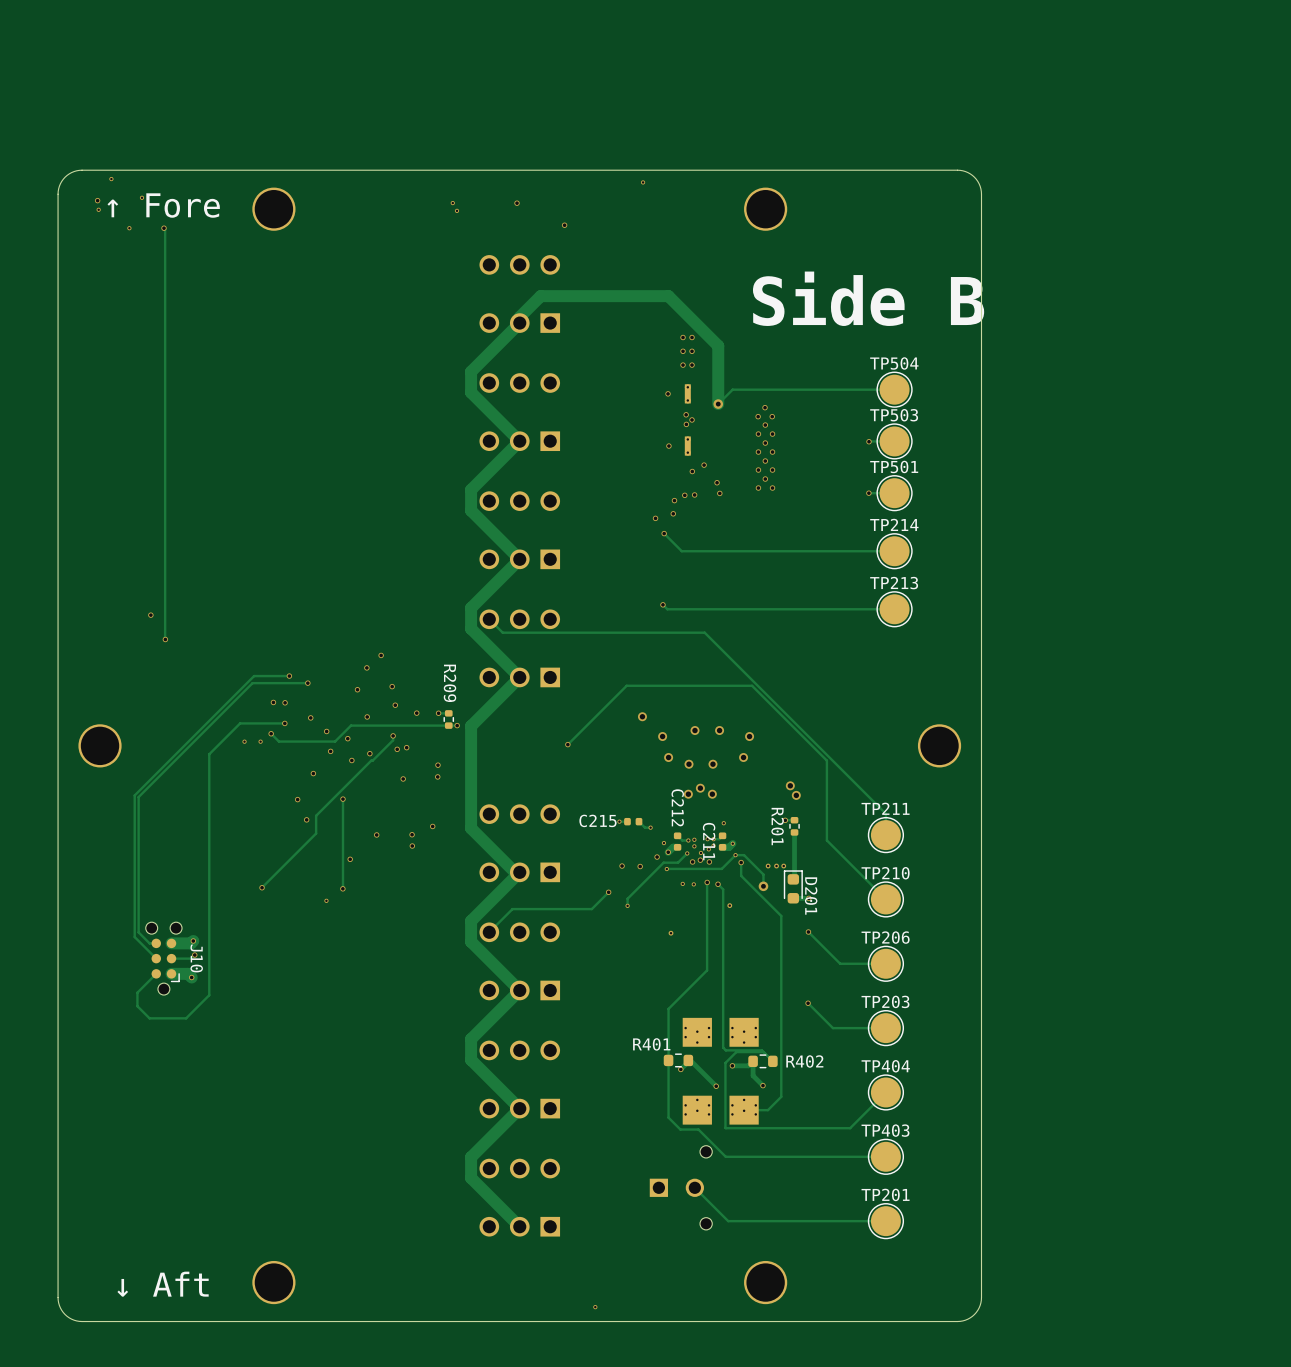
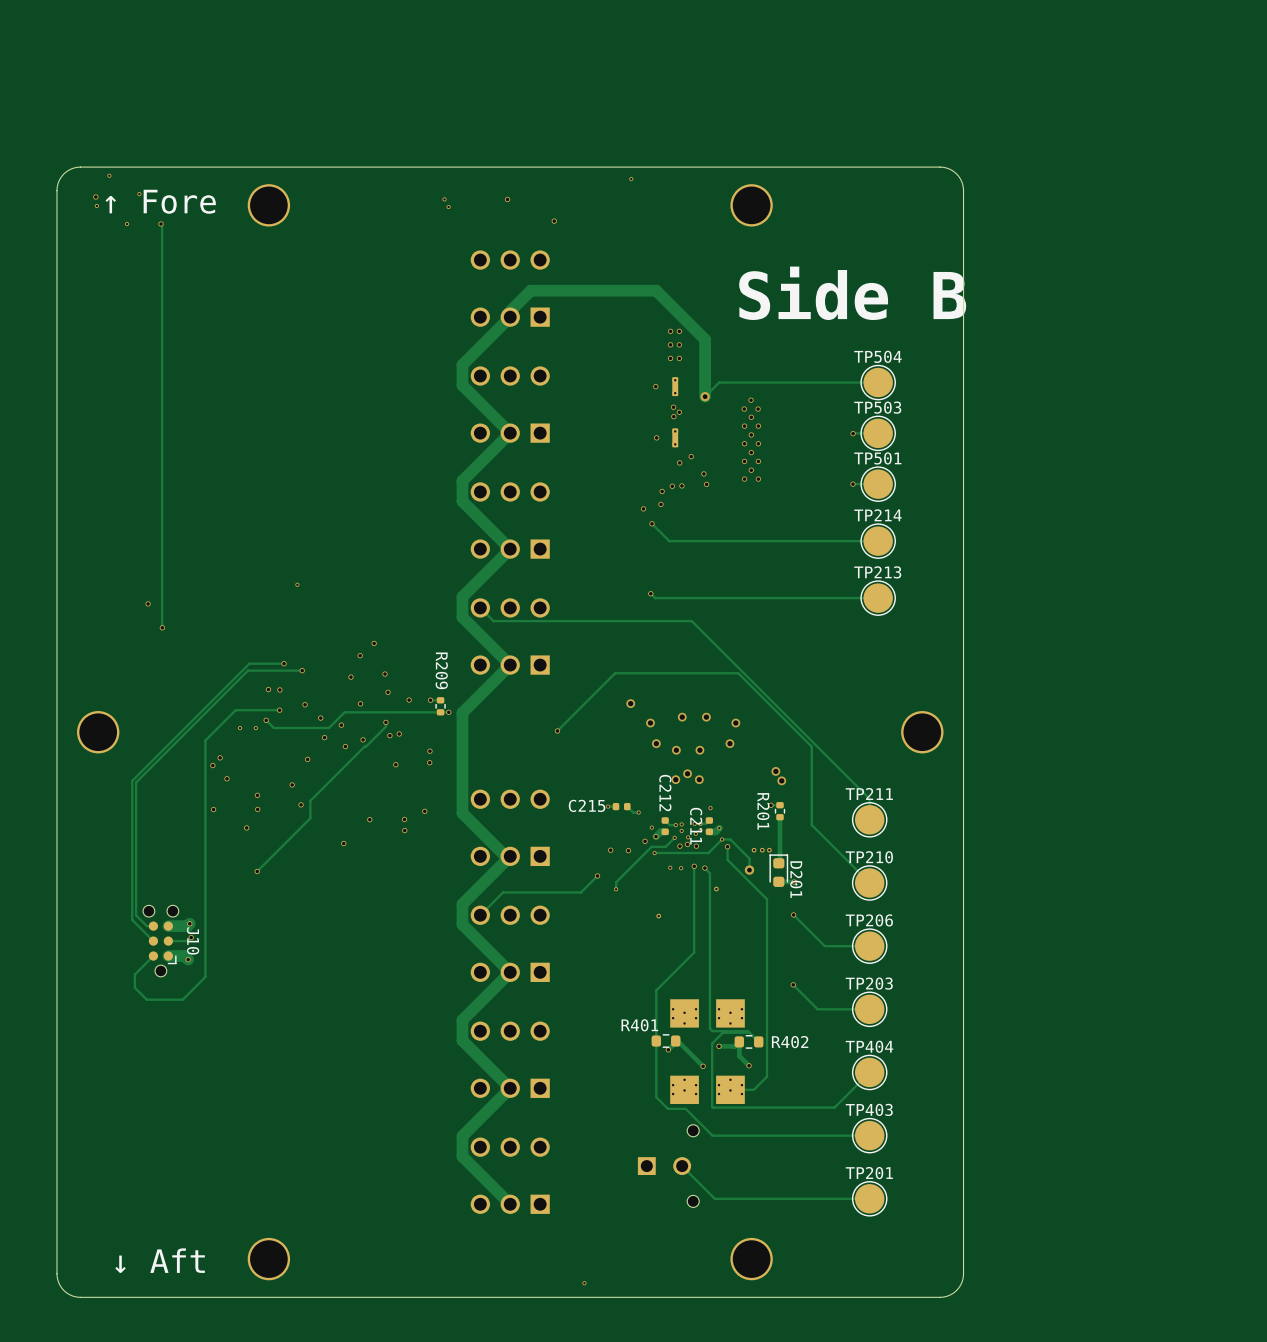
via: none -> (297, 584)
via: none -> (220, 757)
via: none -> (212, 765)
via: none -> (226, 778)
track: (342, 799) (342, 888) -> none
via: (342, 799) -> none
via: none -> (257, 795)
via: none -> (213, 809)
via: none -> (257, 809)
via: none -> (246, 827)
via: (342, 888) -> none
via: (326, 900) -> none

